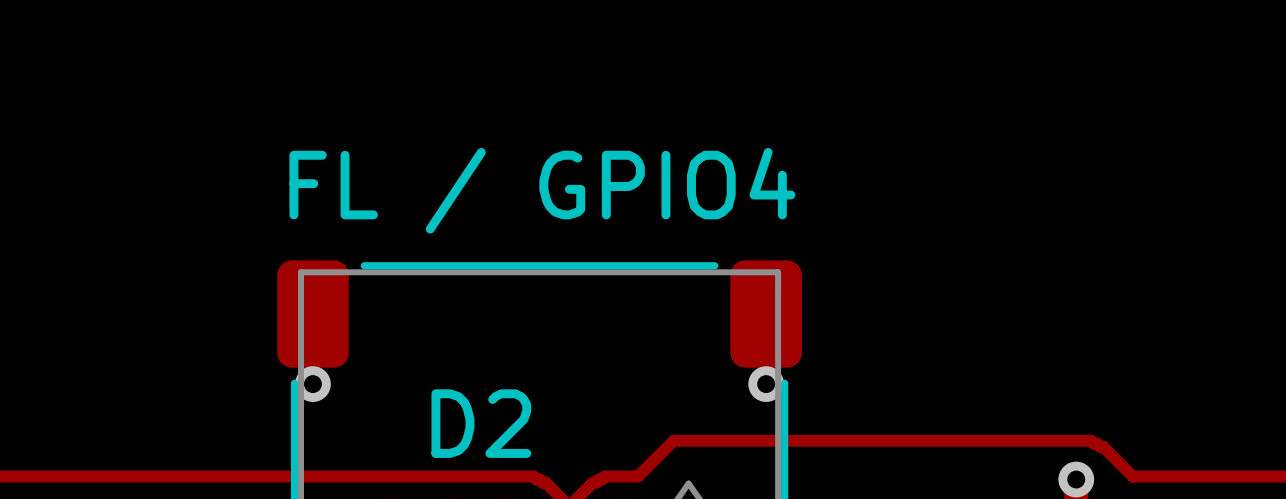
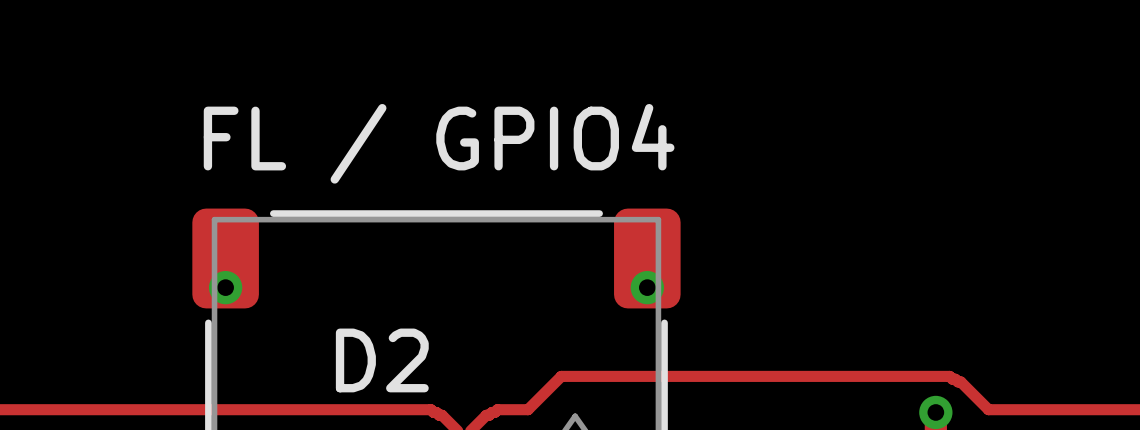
via position: (312, 384) -> (225, 287)
via position: (766, 384) -> (647, 287)

